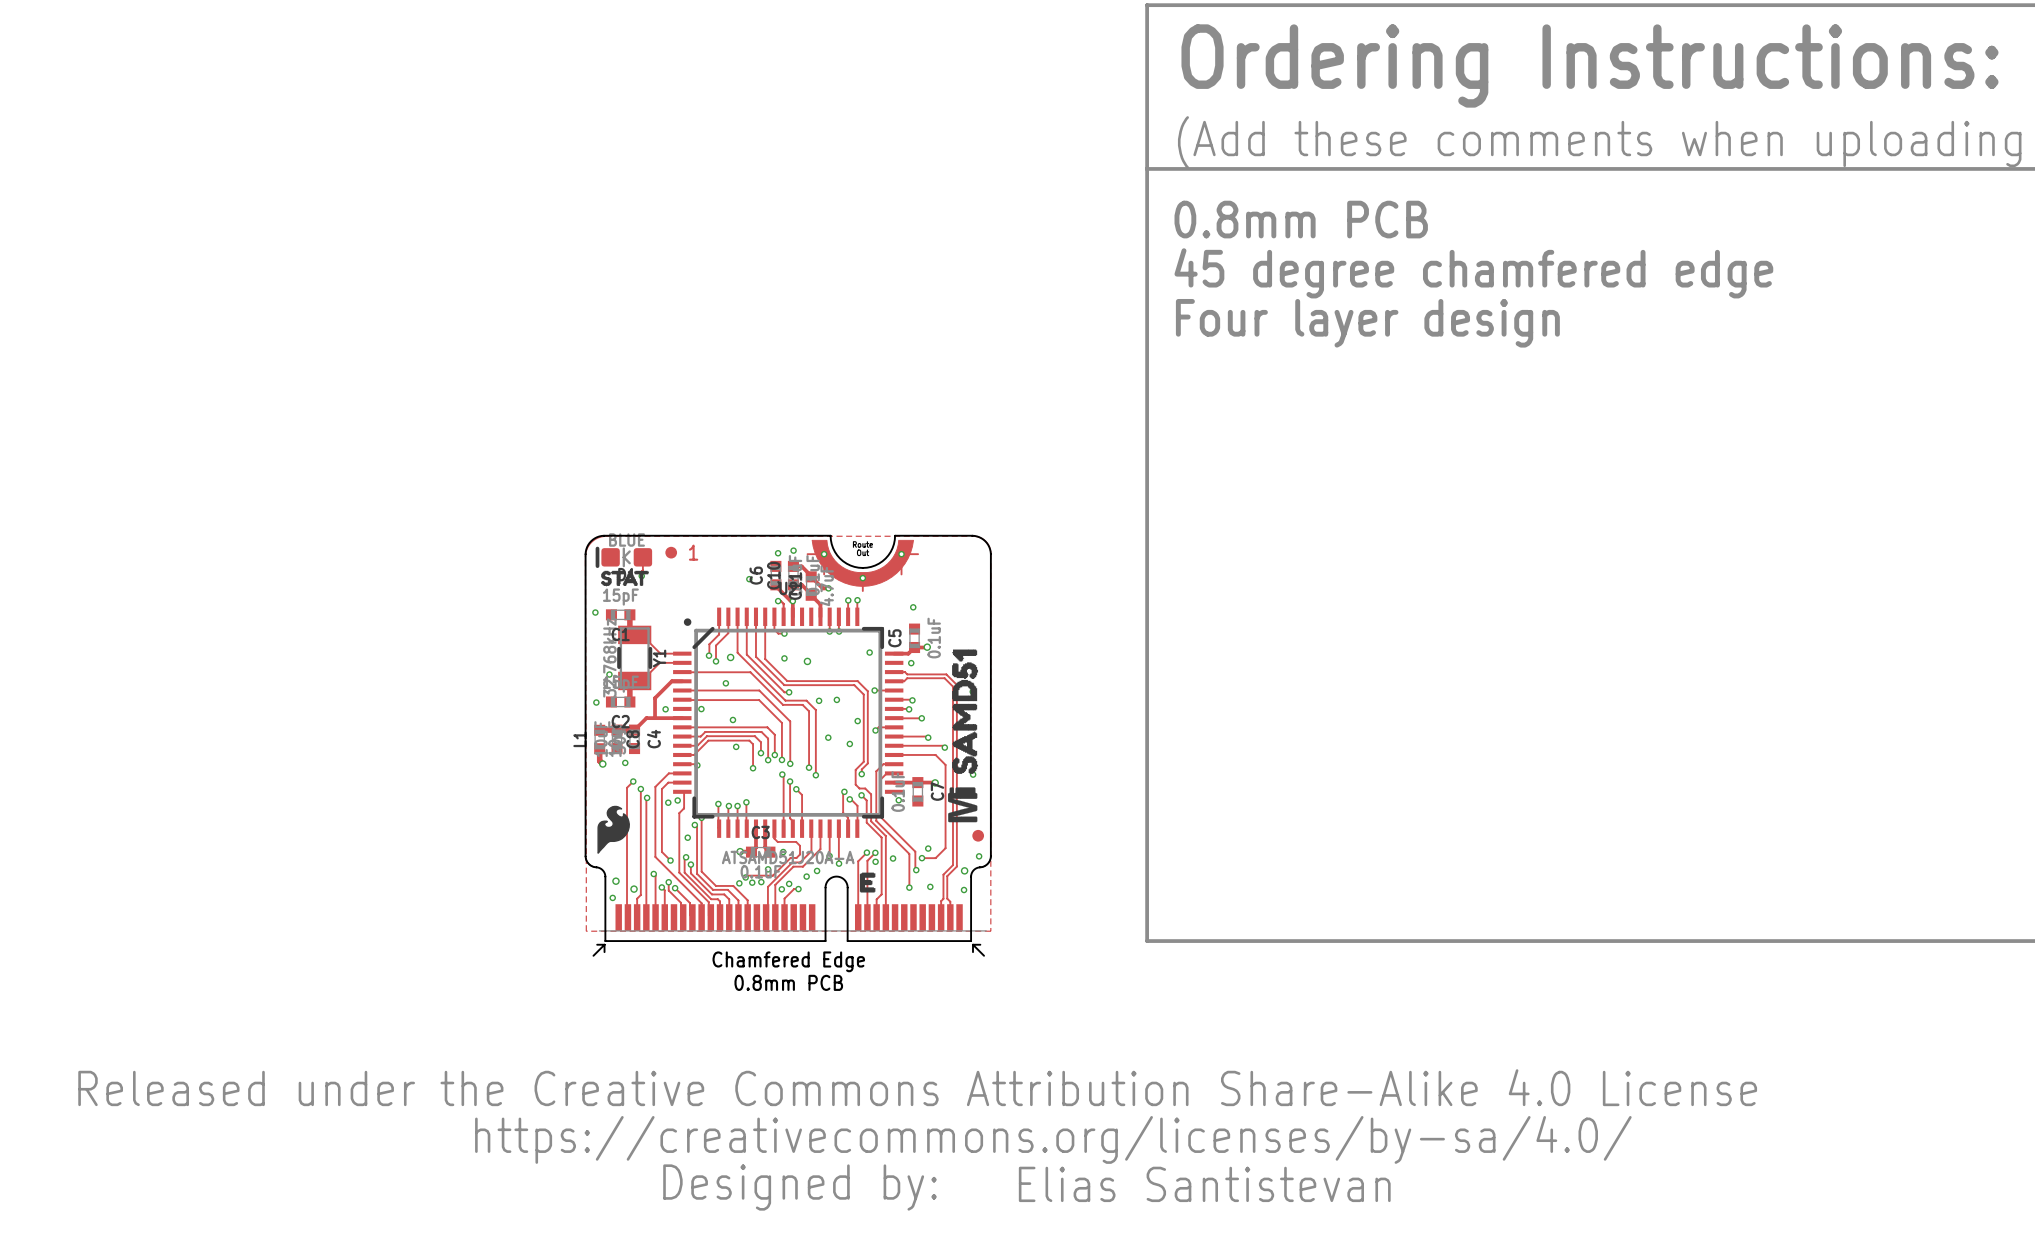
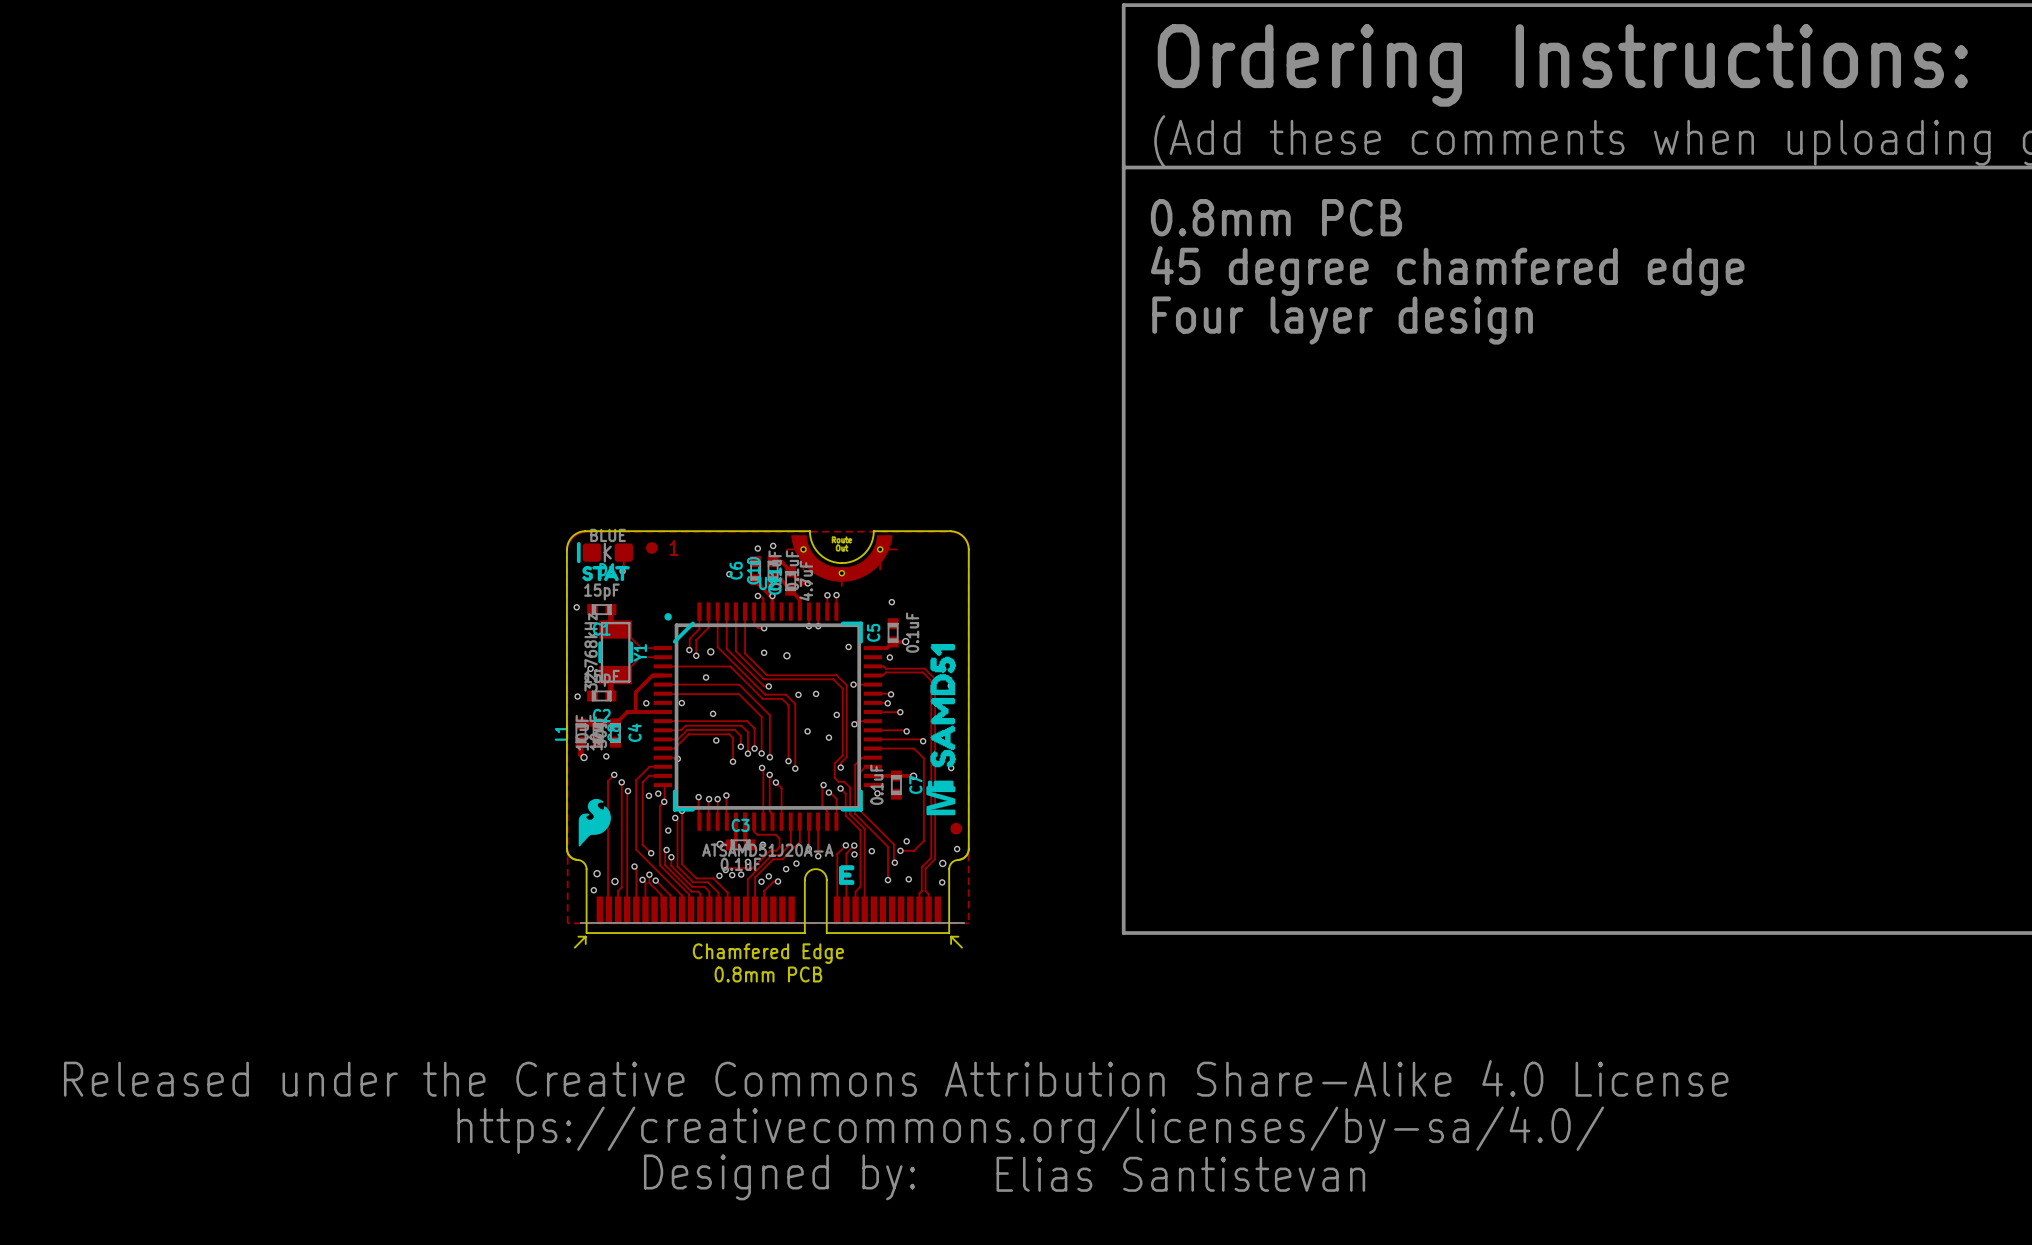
via: none -> (664, 801)

